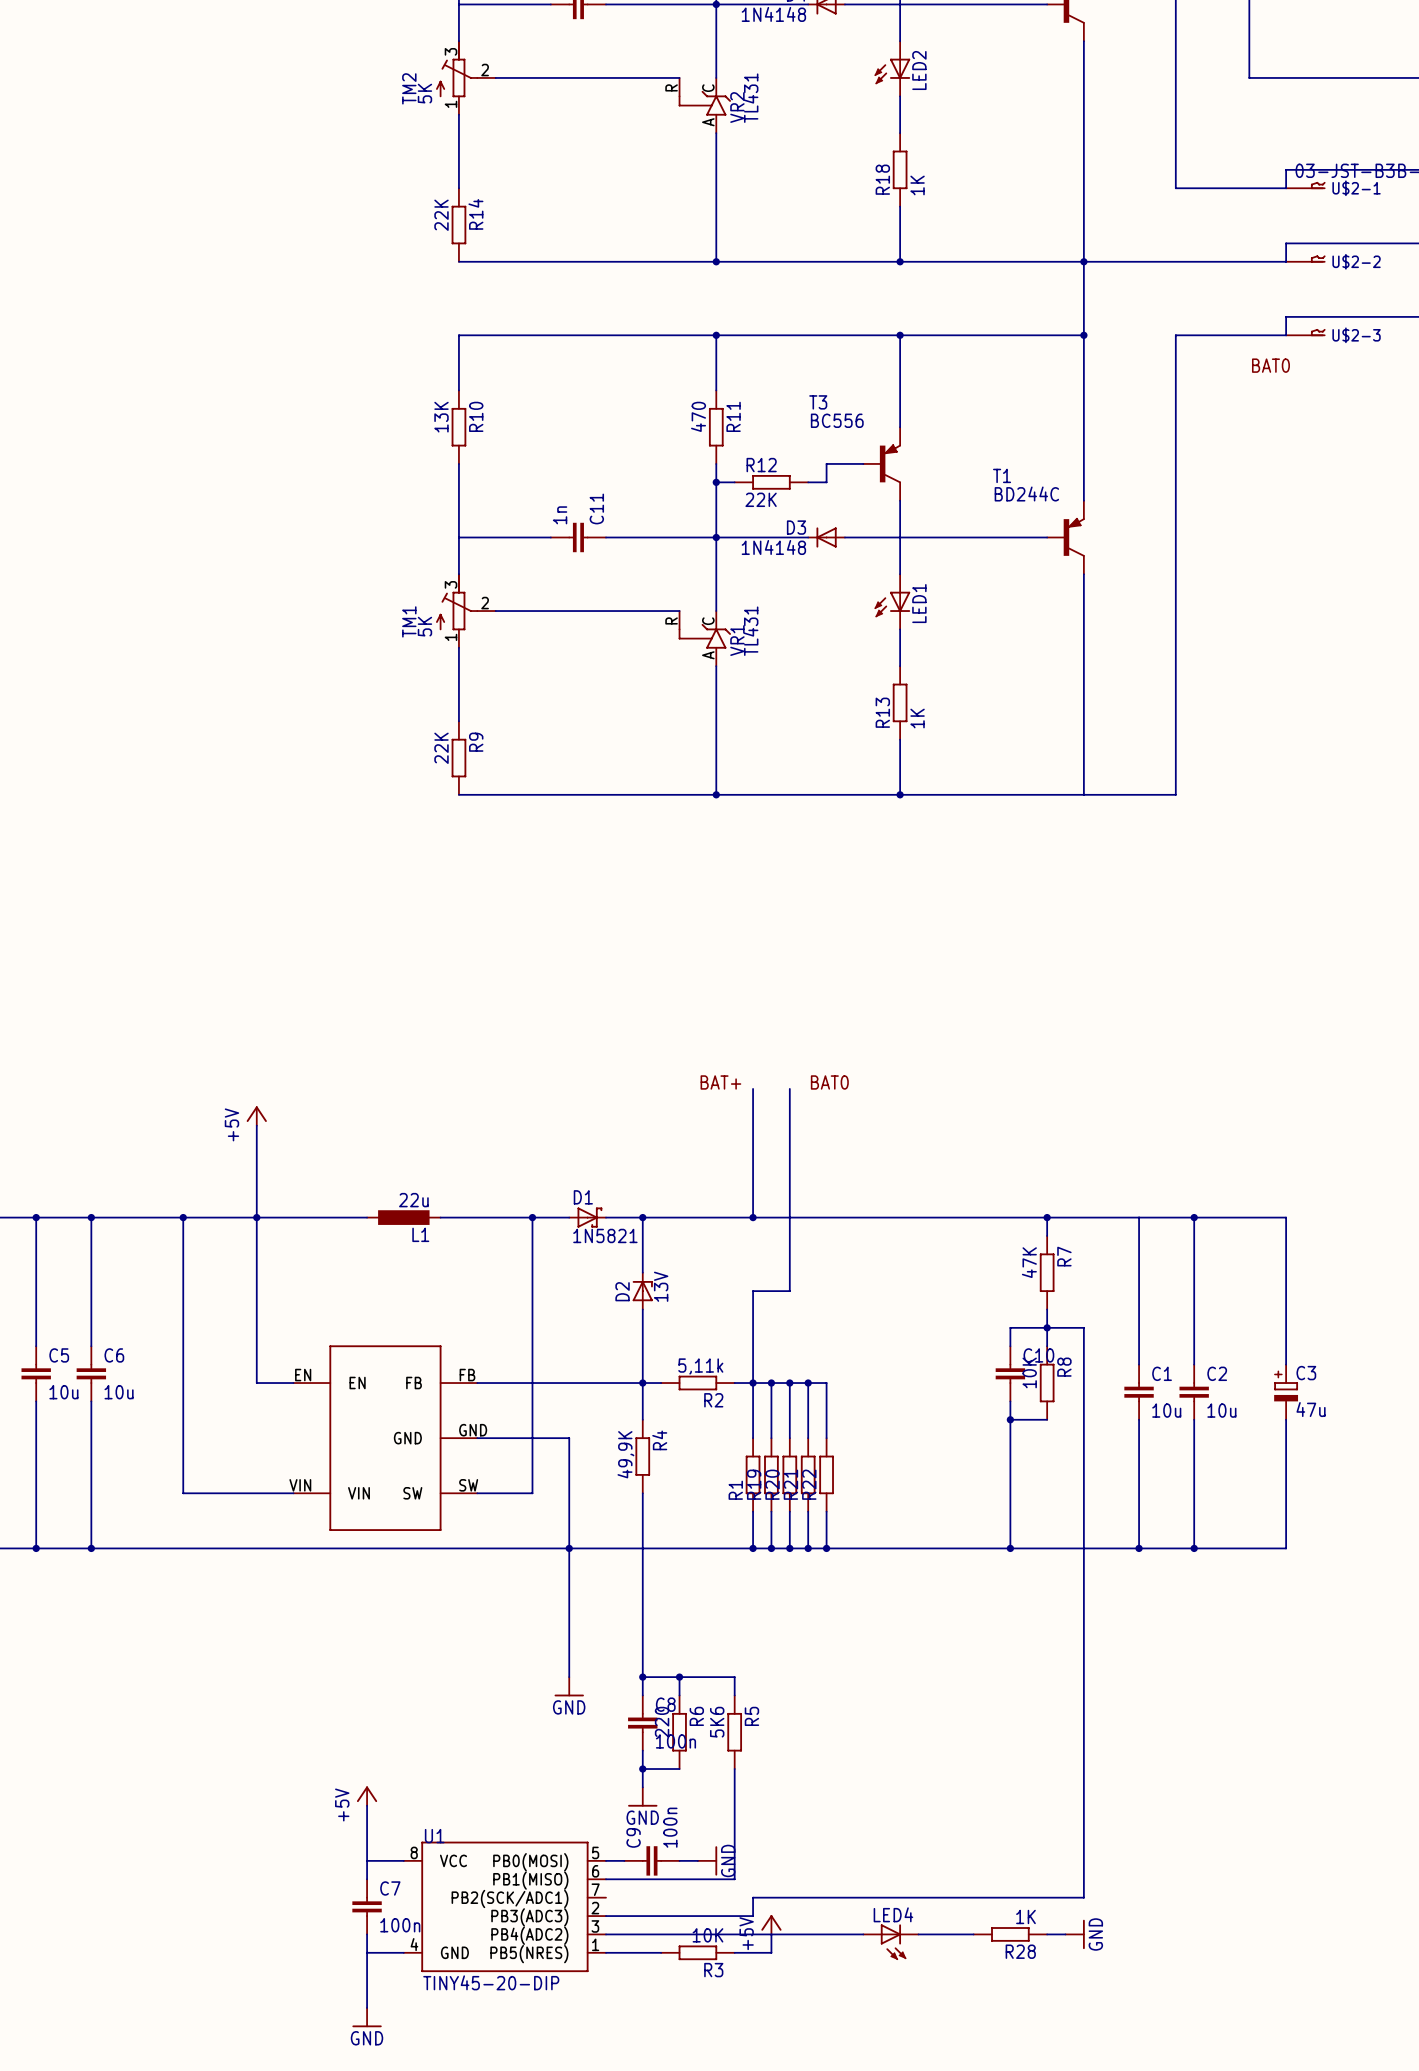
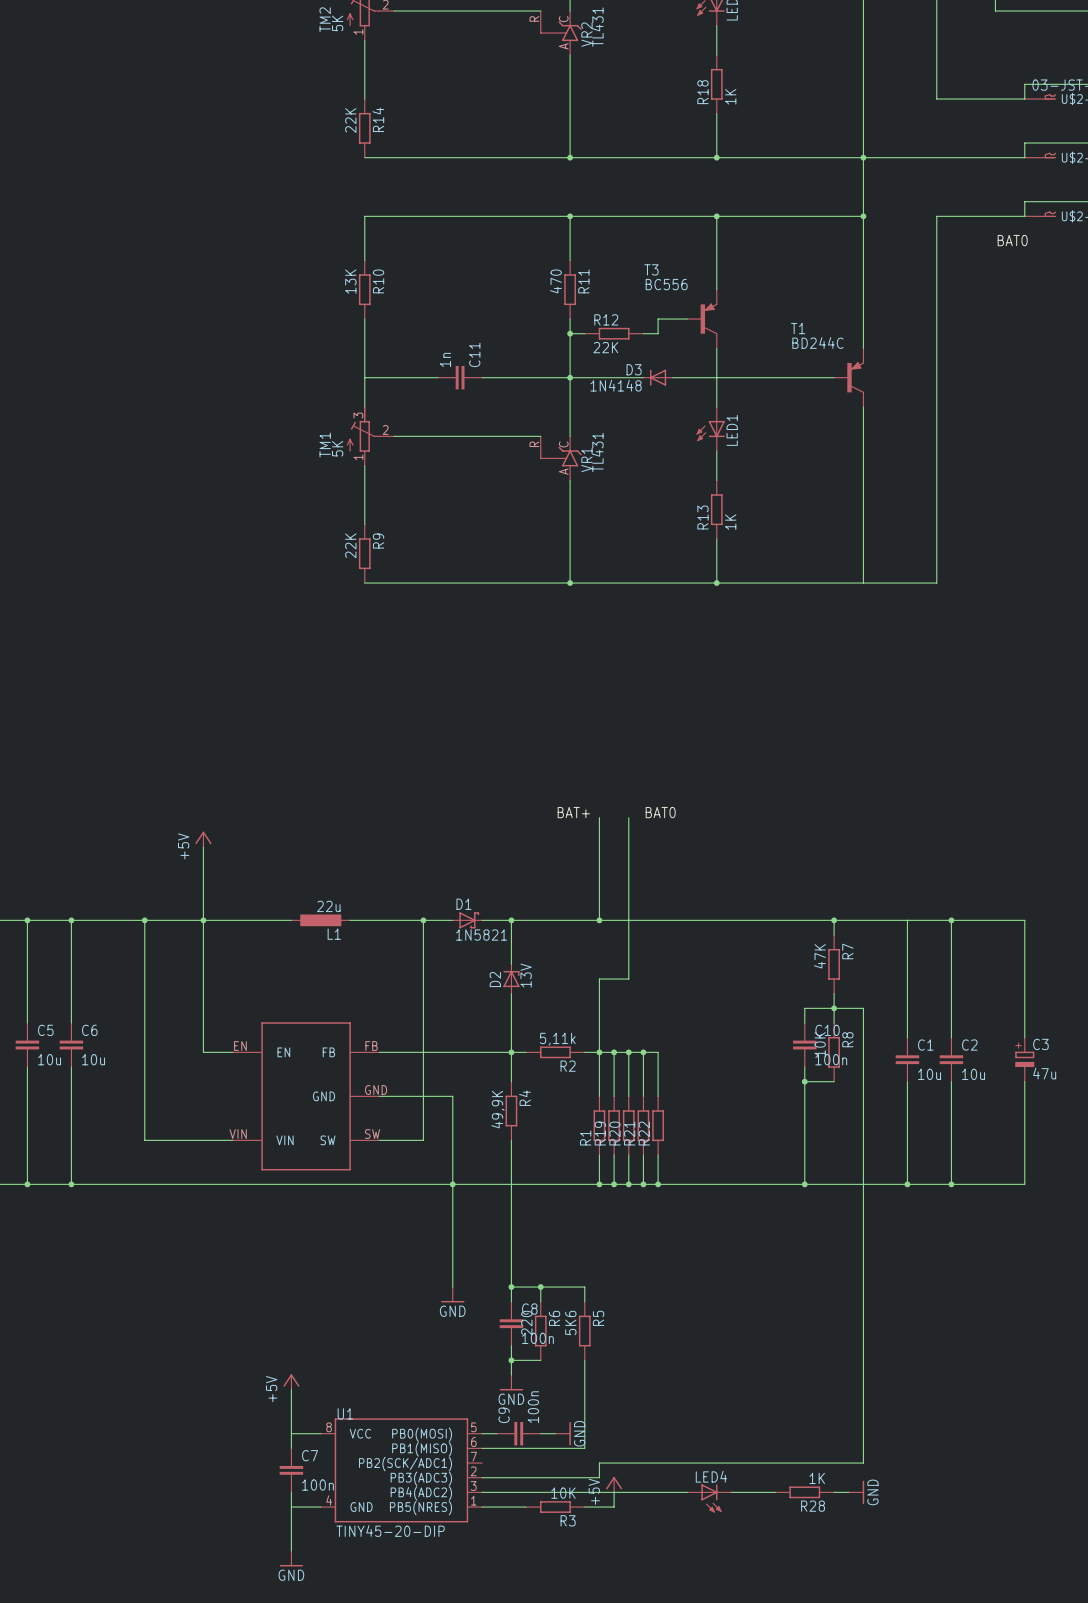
C10 value: none -> 100n (831, 1059)

